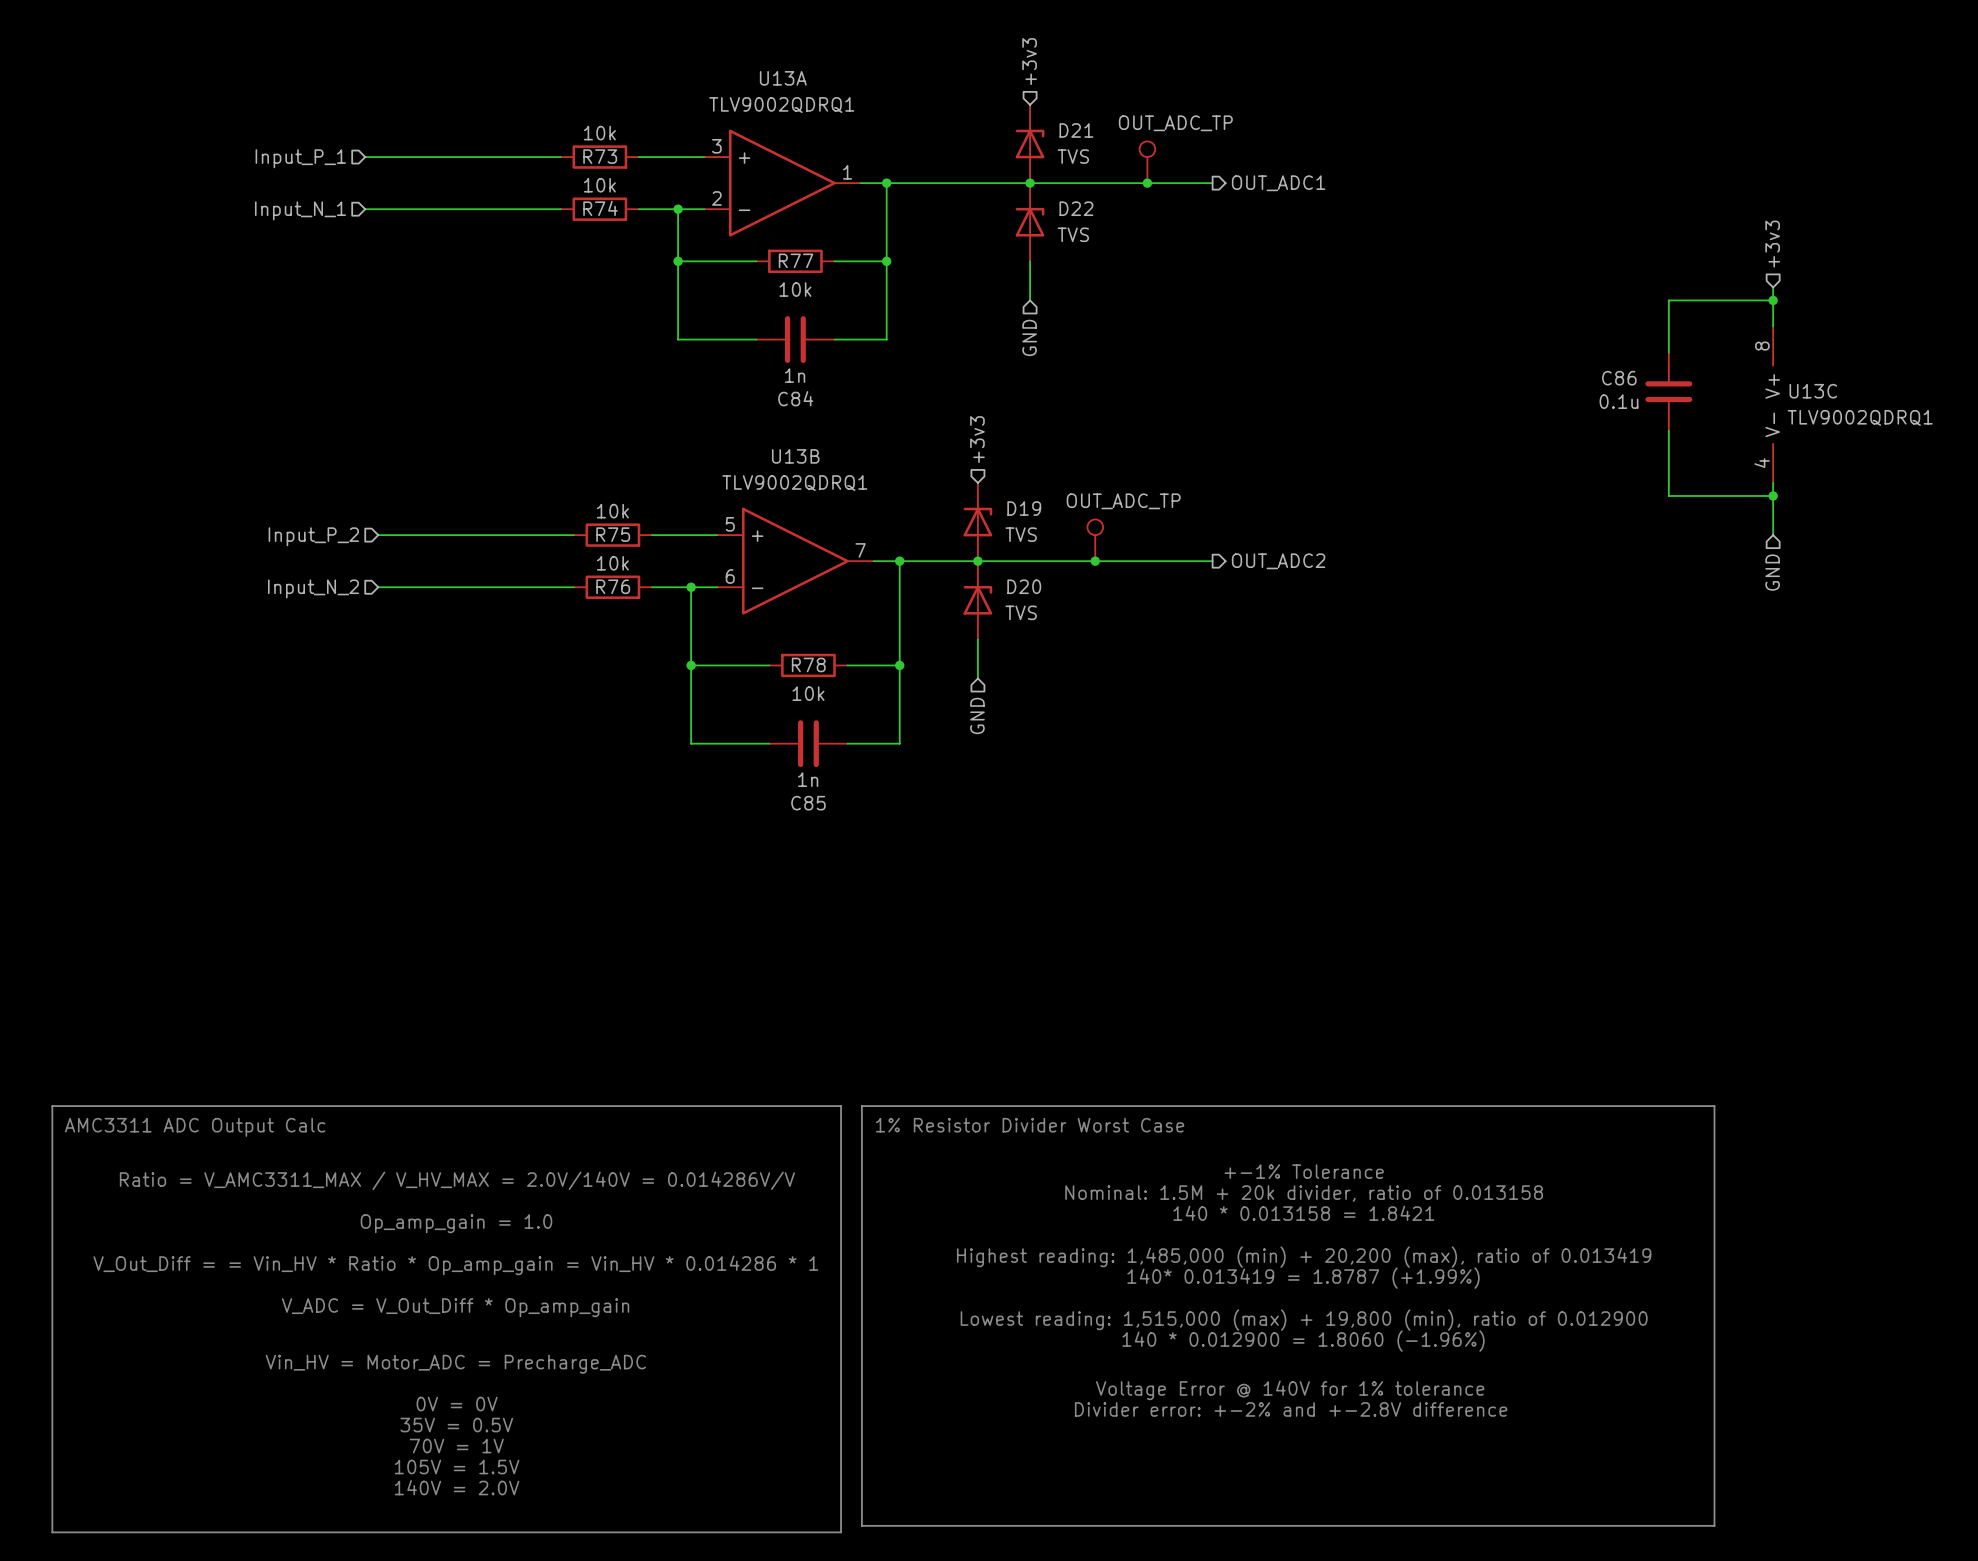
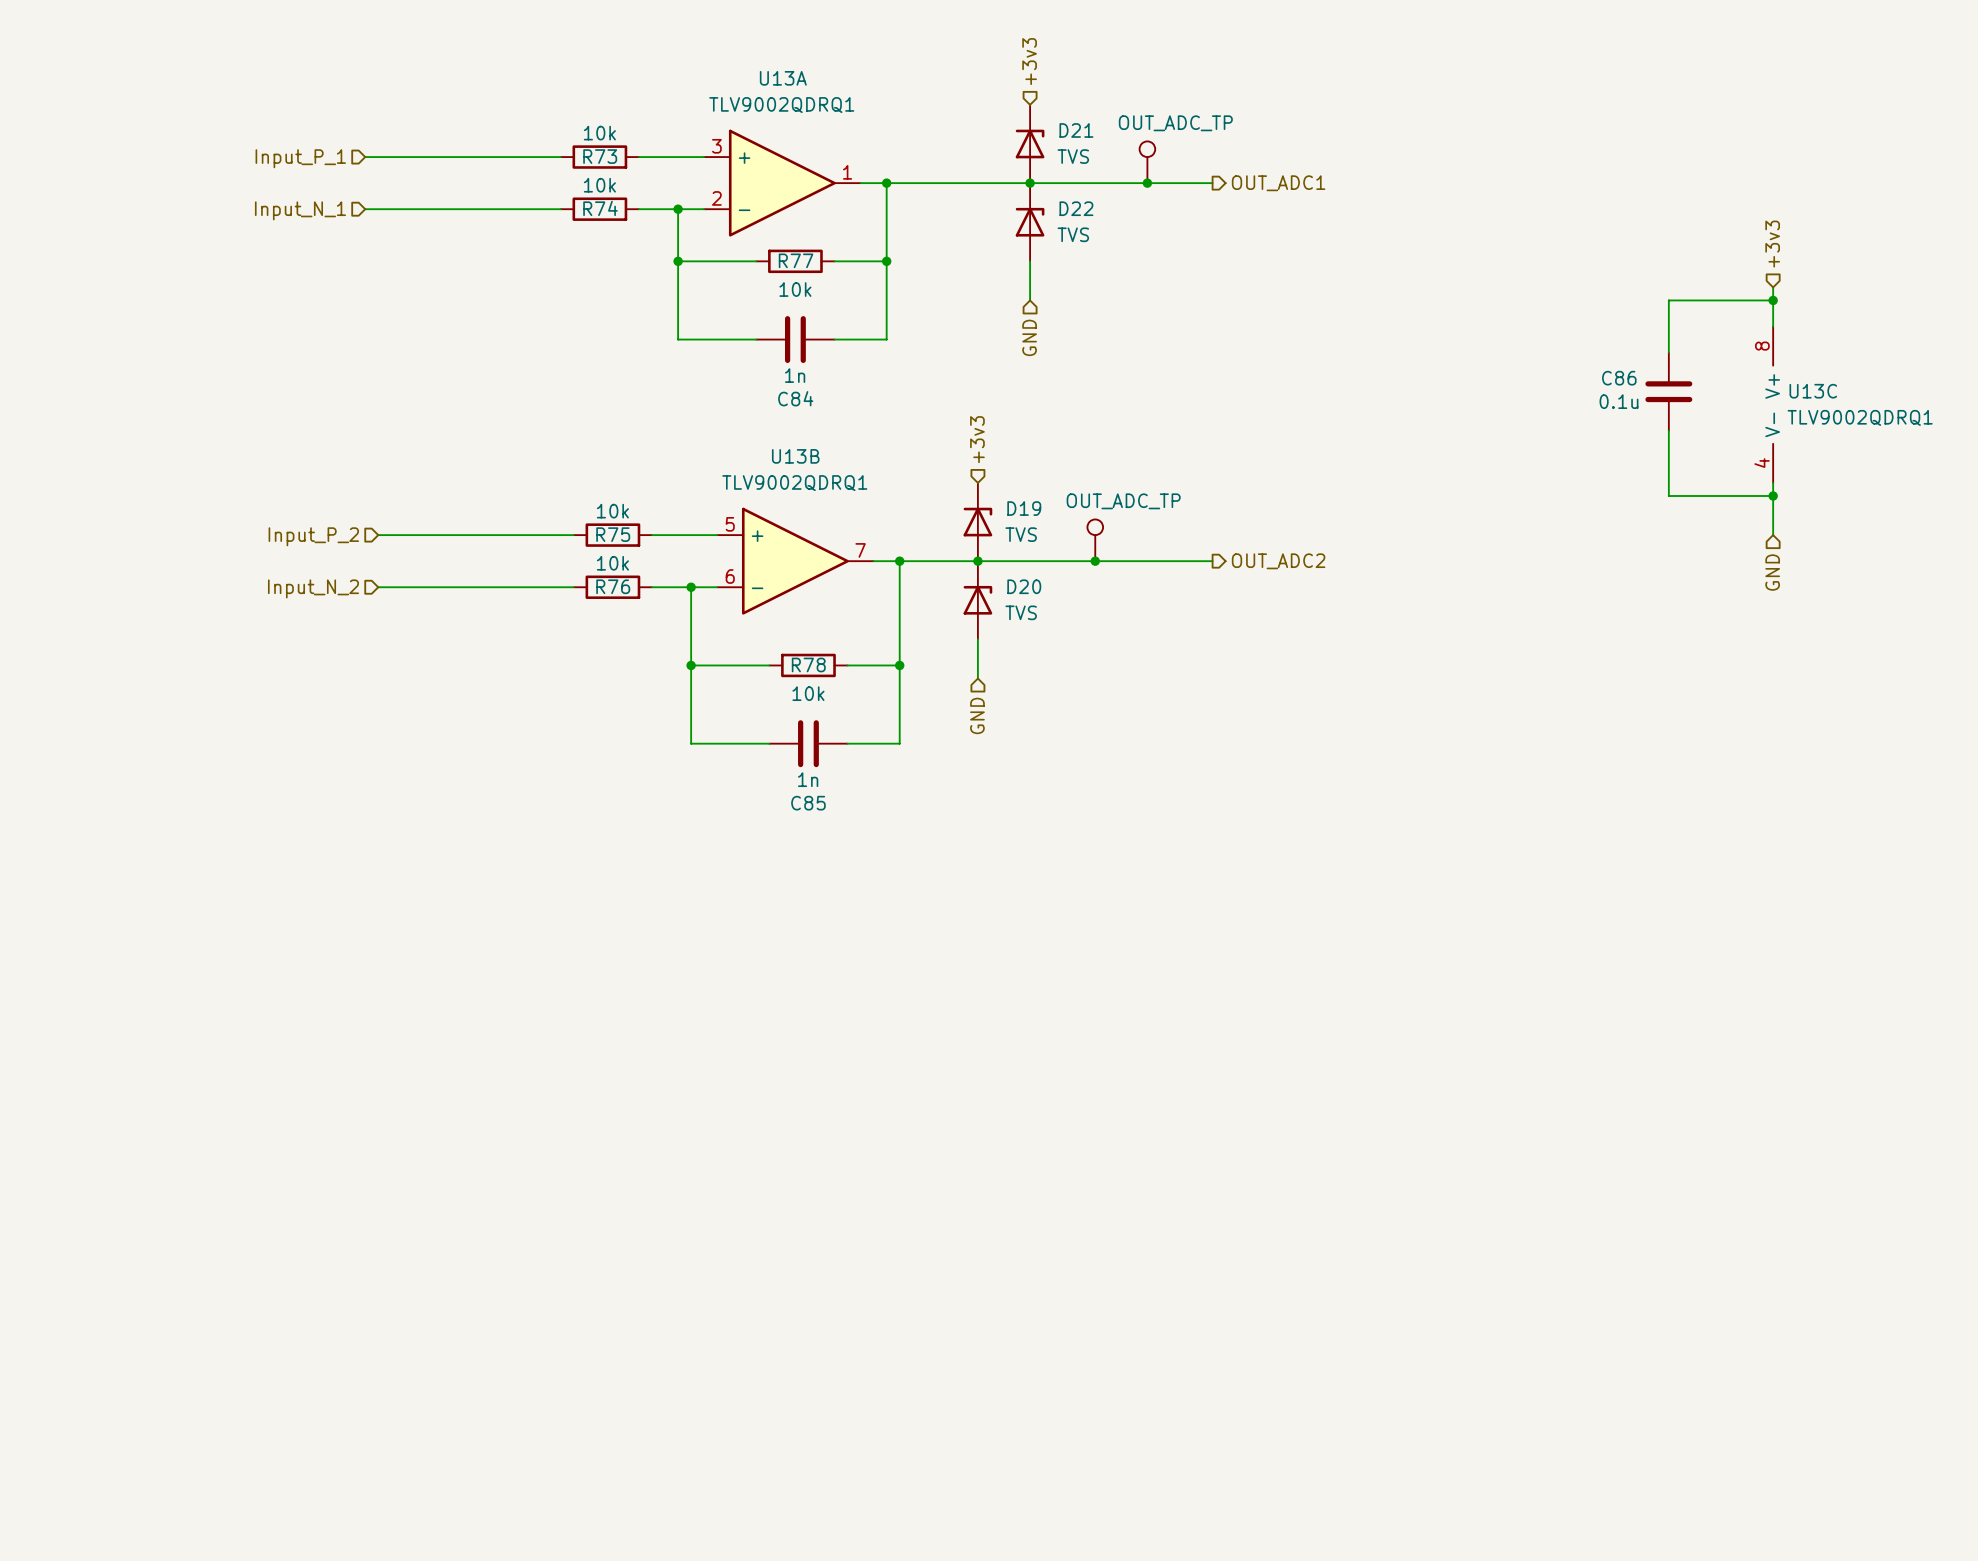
line: (52, 1106) (841, 1106) (841, 1532) (52, 1532) (52, 1106) -> none
line: (861, 1106) (1714, 1106) (1714, 1525) (861, 1525) (861, 1106) -> none
text: 1% Resistor Divider Worst Case (1030, 1125) -> none
text: AMC3311 ADC Output Calc (195, 1127) -> none
text: +-1% Tolerance (1304, 1171) -> none
text: Ratio = V_AMC3311_MAX / V_HV_MAX = 2.0V/140V = 0.014286V/V (457, 1180) -> none
text: Nominal: 1.5M + 20k divider, ratio of 0.013158 (1304, 1193) -> none
text: 140 * 0.013158 = 1.8421 (1303, 1213) -> none
text: Op_amp_gain = 1.0 (456, 1223) -> none
text: Highest reading: 1,485,000 (min) + 20,200 (max), ratio of 0.013419 (1304, 1257) -> none
text: V_Out_Diff = = Vin_HV * Ratio * Op_amp_gain = Vin_HV * 0.014286 * 1 (455, 1265) -> none
text: 140* 0.013419 = 1.8787 (+1.99%) (1303, 1278) -> none
text: V_ADC = V_Out_Diff * Op_amp_gain (455, 1307) -> none
text: Lowest reading: 1,515,000 (max) + 19,800 (min), ratio of 0.012900 (1304, 1320) -> none
text: 140 * 0.012900 = 1.8060 (-1.96%) (1303, 1341) -> none
text: Vin_HV = Motor_ADC = Precharge_ADC (455, 1364) -> none
text: Voltage Error @ 140V for 1% tolerance (1290, 1390) -> none
text: 0V = 0V (457, 1404) -> none
text: Divider error: +-2% and +-2.8V difference (1291, 1409) -> none
text: 35V = 0.5V (456, 1425) -> none
text: 70V = 1V (456, 1446) -> none
text: 105V = 1.5V (457, 1467) -> none
text: 140V = 2.0V (457, 1487) -> none

